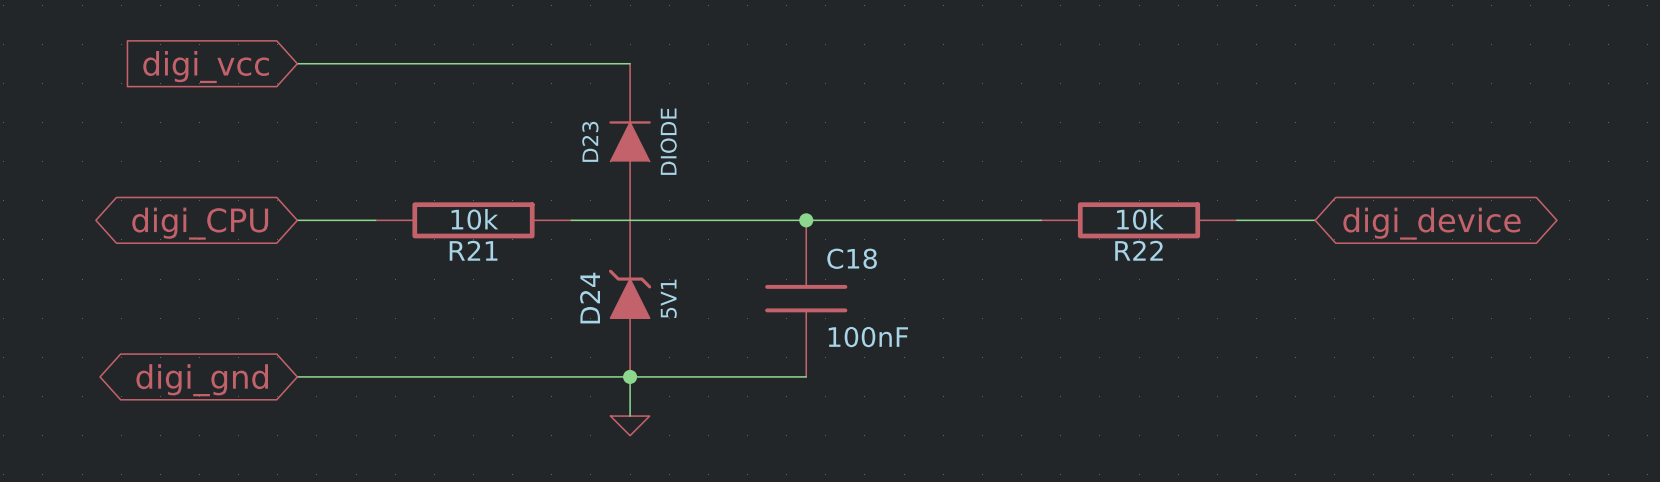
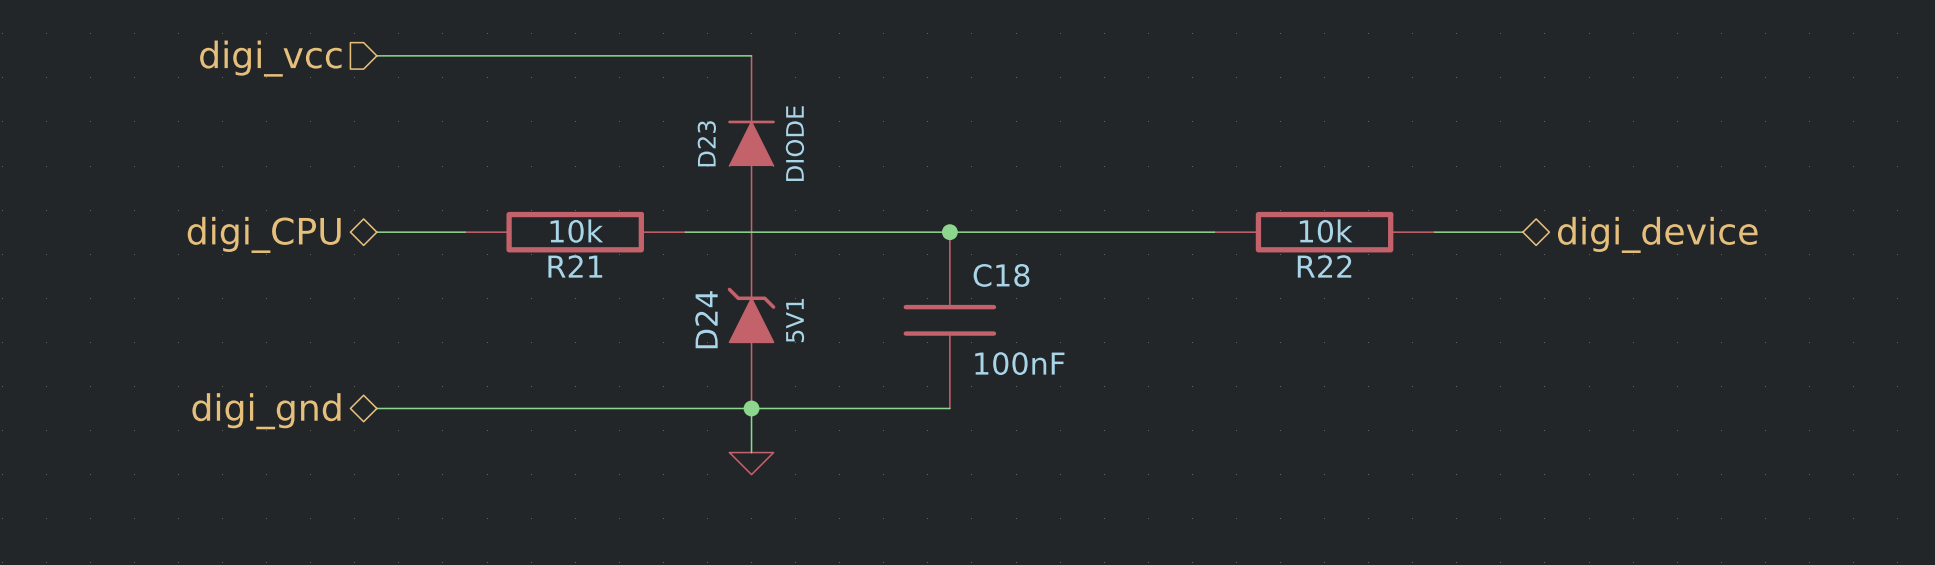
hierarchical label: none -> digi_vcc (270, 58)
global label: digi_vcc (206, 67) -> none
hierarchical label: none -> digi_CPU (264, 234)
hierarchical label: none -> digi_device (1657, 234)
global label: digi_CPU (200, 223) -> none
global label: digi_device (1431, 223) -> none
hierarchical label: none -> digi_gnd (266, 411)
global label: digi_gnd (202, 380) -> none

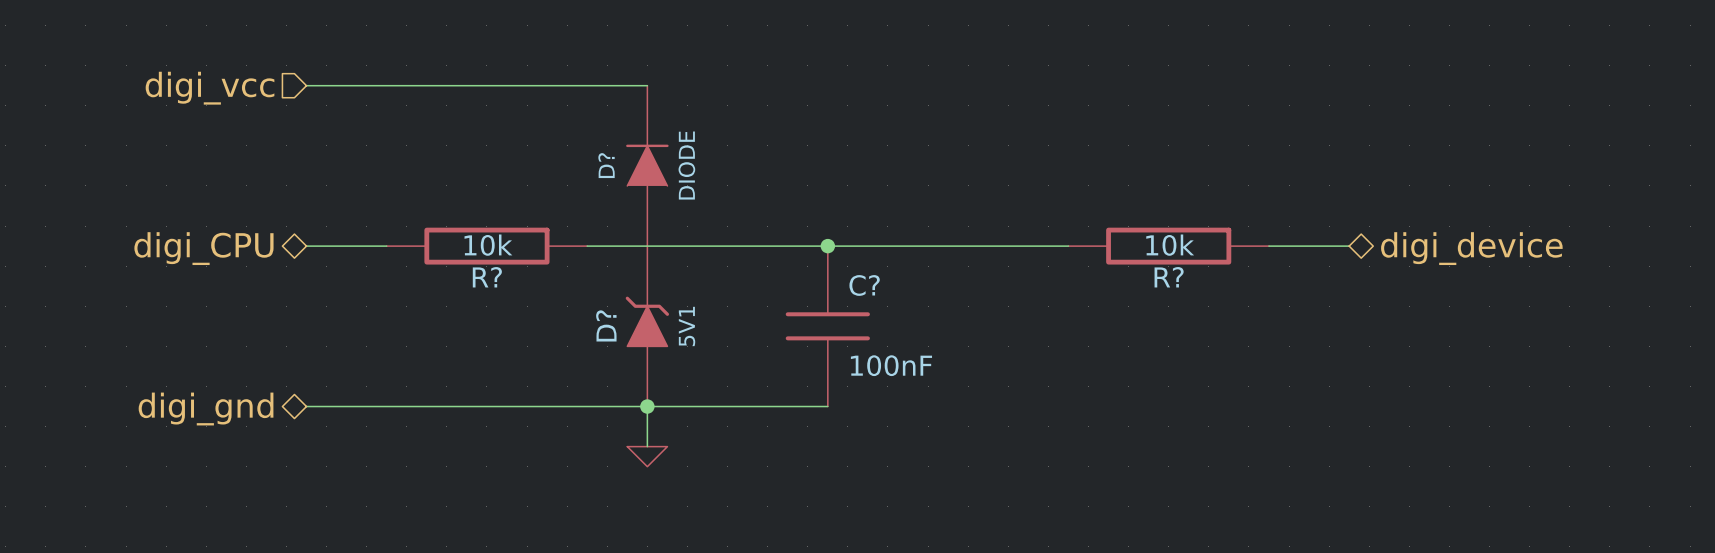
D23 name: D23 (706, 143) -> D? (606, 165)
R21 name: R21 (575, 266) -> R? (487, 277)
R22 name: R22 (1324, 266) -> R? (1169, 277)
C18 name: C18 (1001, 275) -> C? (864, 285)
D24 name: D24 (706, 319) -> D? (606, 325)

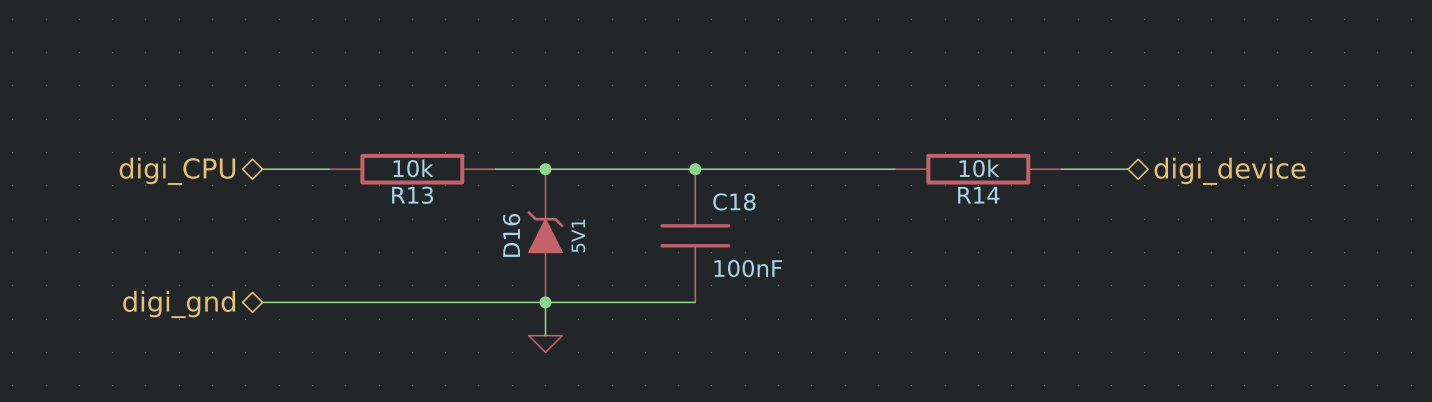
wire: (306, 85) (647, 85) -> none
hierarchical label: digi_vcc (210, 88) -> none
D?: DIODE (647, 165) -> none
junction: none -> (545, 169)
R? name: R? (487, 277) -> R13 (412, 195)
R? name: R? (1169, 277) -> R14 (978, 195)
C? name: C? (864, 285) -> C18 (734, 201)
D? name: D? (606, 325) -> D16 (511, 235)

